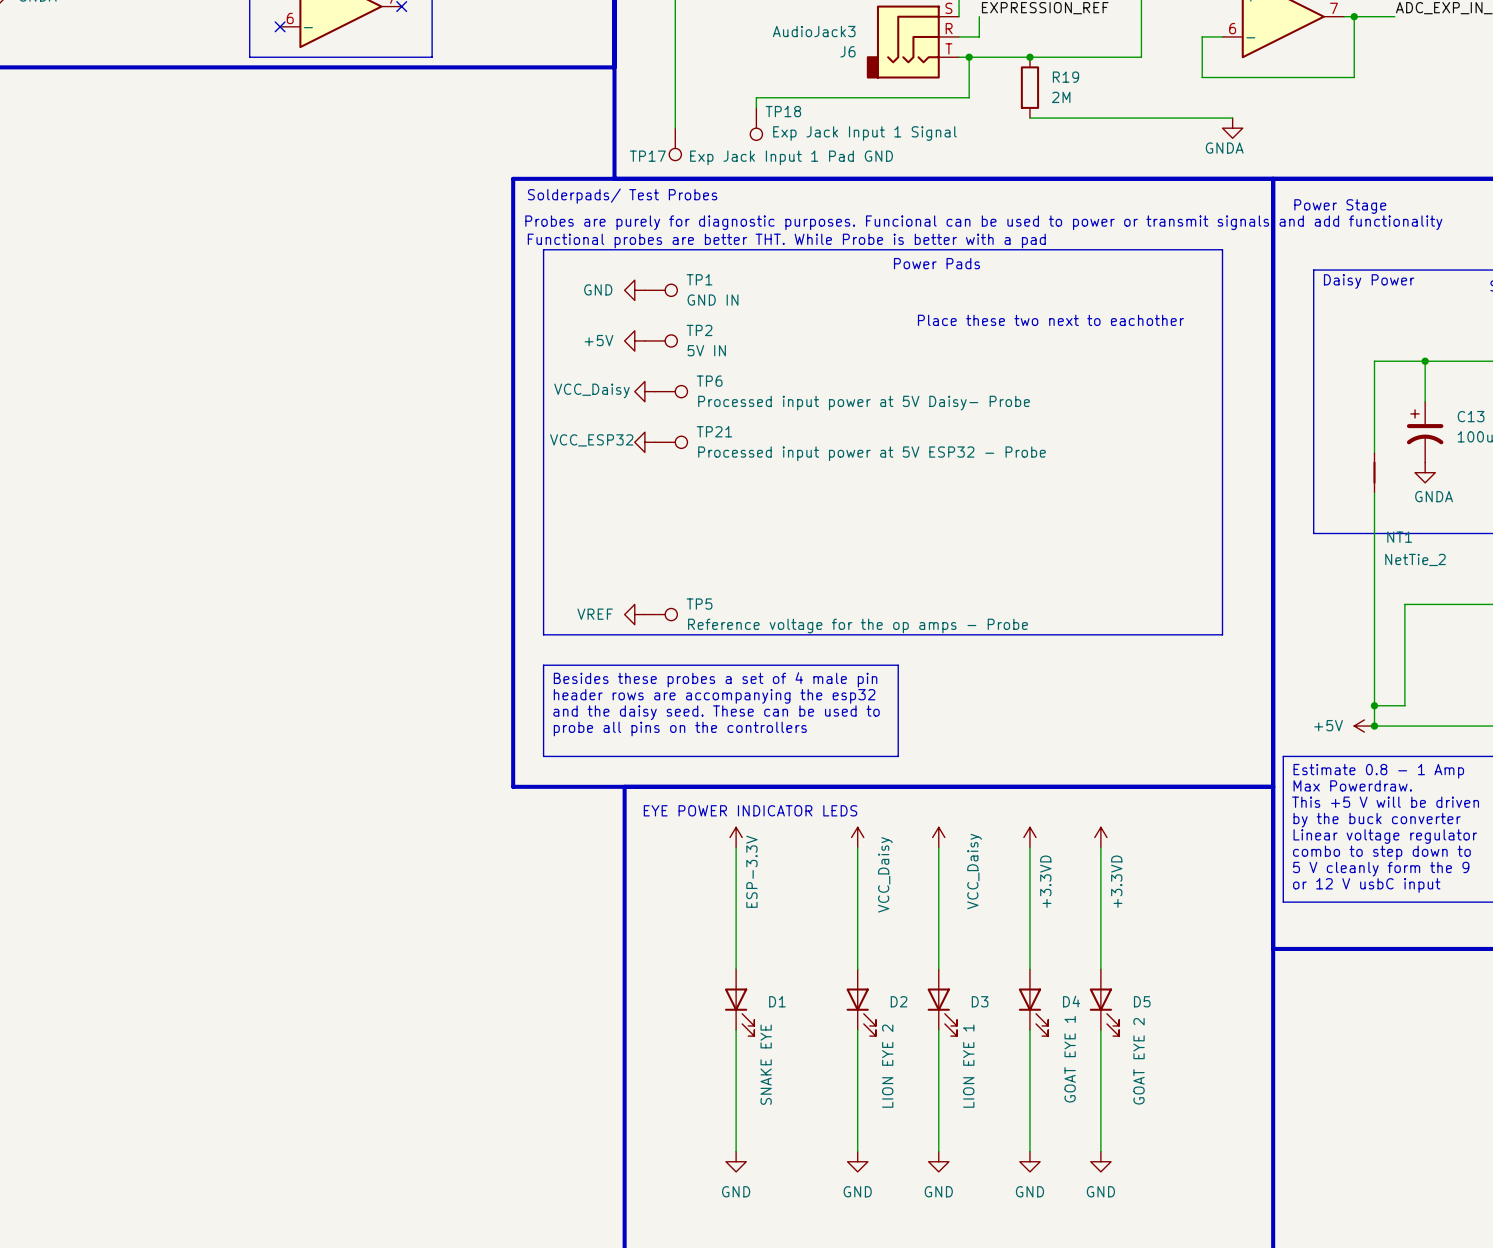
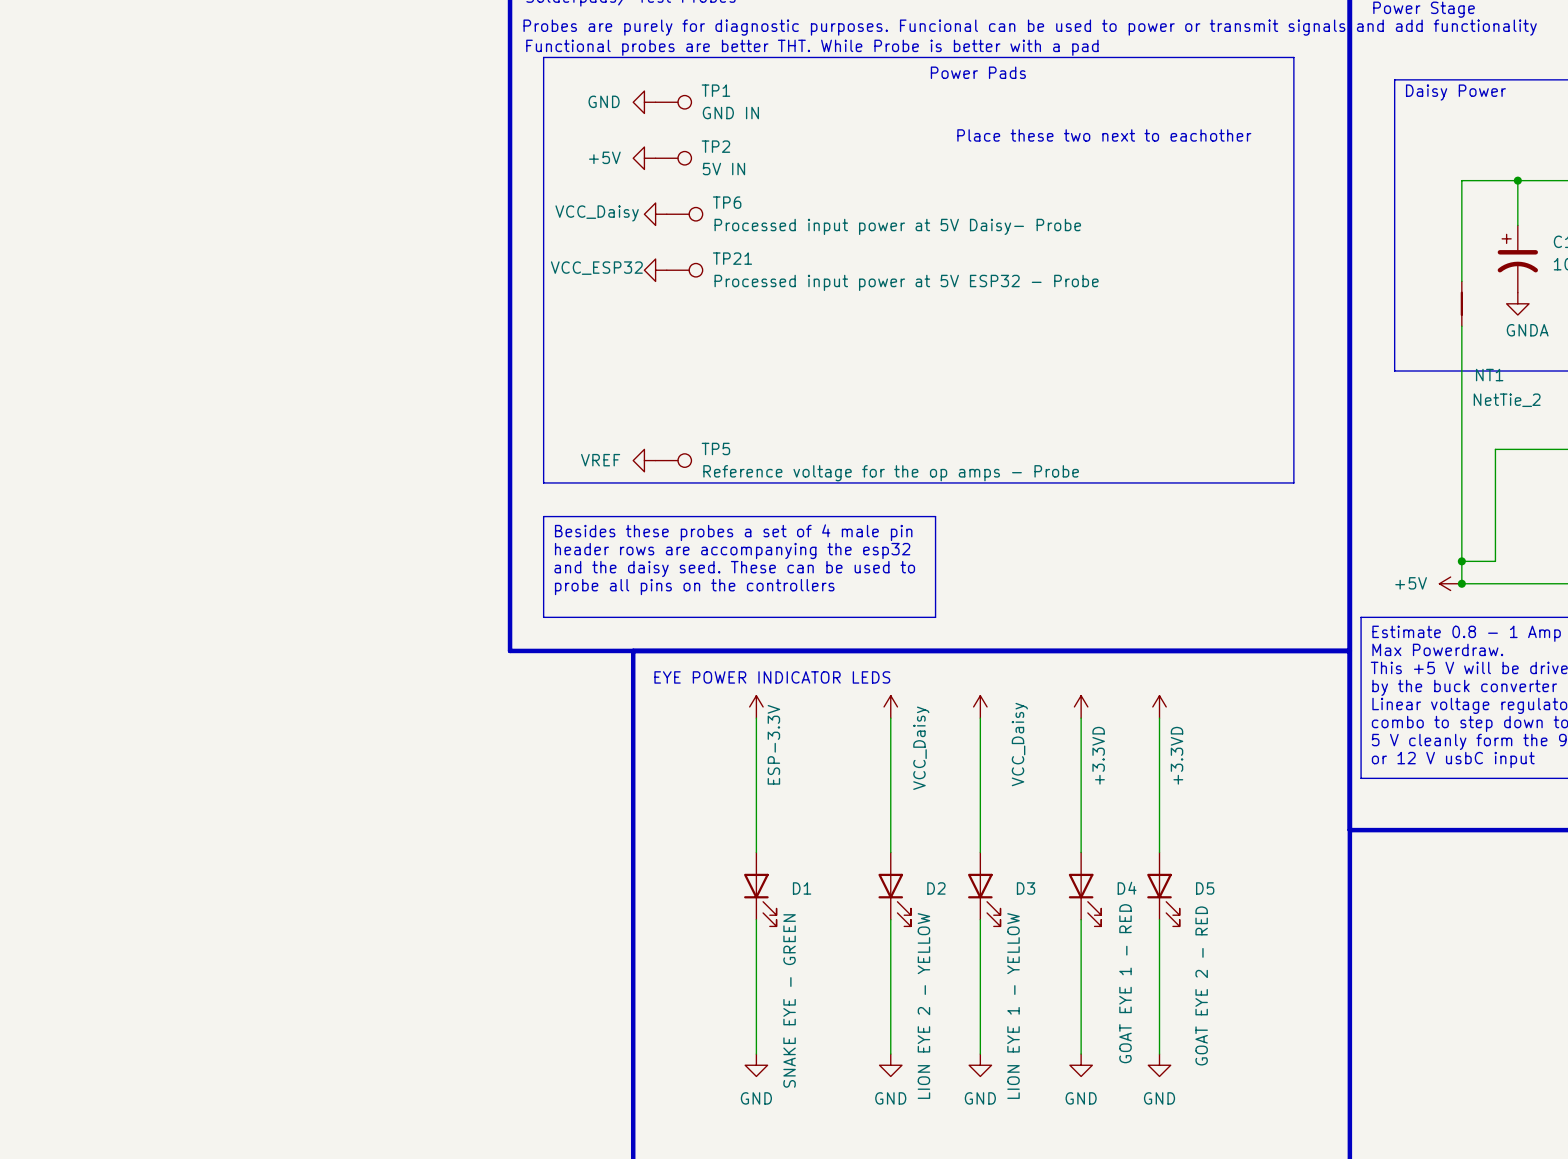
D4 value: GOAT EYE 1 (1070, 1059) -> GOAT EYE 1 - RED (1125, 983)
D5 value: GOAT EYE 2 (1139, 1061) -> GOAT EYE 2 - RED (1201, 985)
D1 value: SNAKE EYE (766, 1064) -> SNAKE EYE - GREEN (789, 1000)
D2 value: LION EYE 2 (887, 1066) -> LION EYE 2 - YELLOW (923, 1006)
D3 value: LION EYE 1 (968, 1066) -> LION EYE 1 - YELLOW (1013, 1006)

